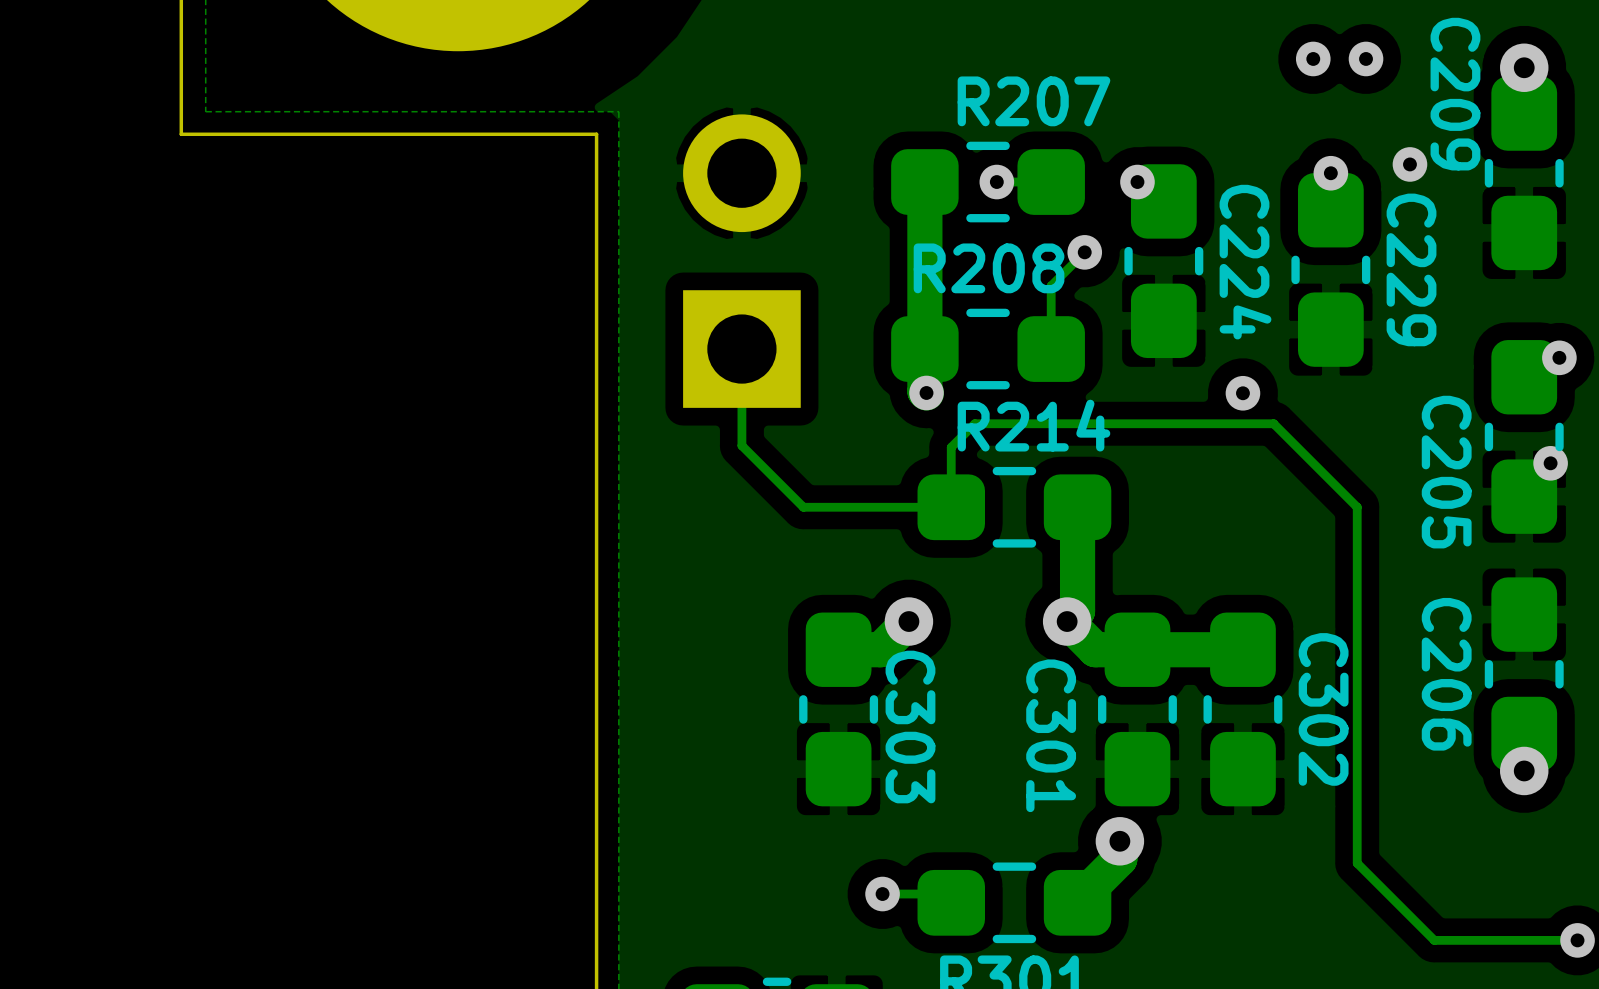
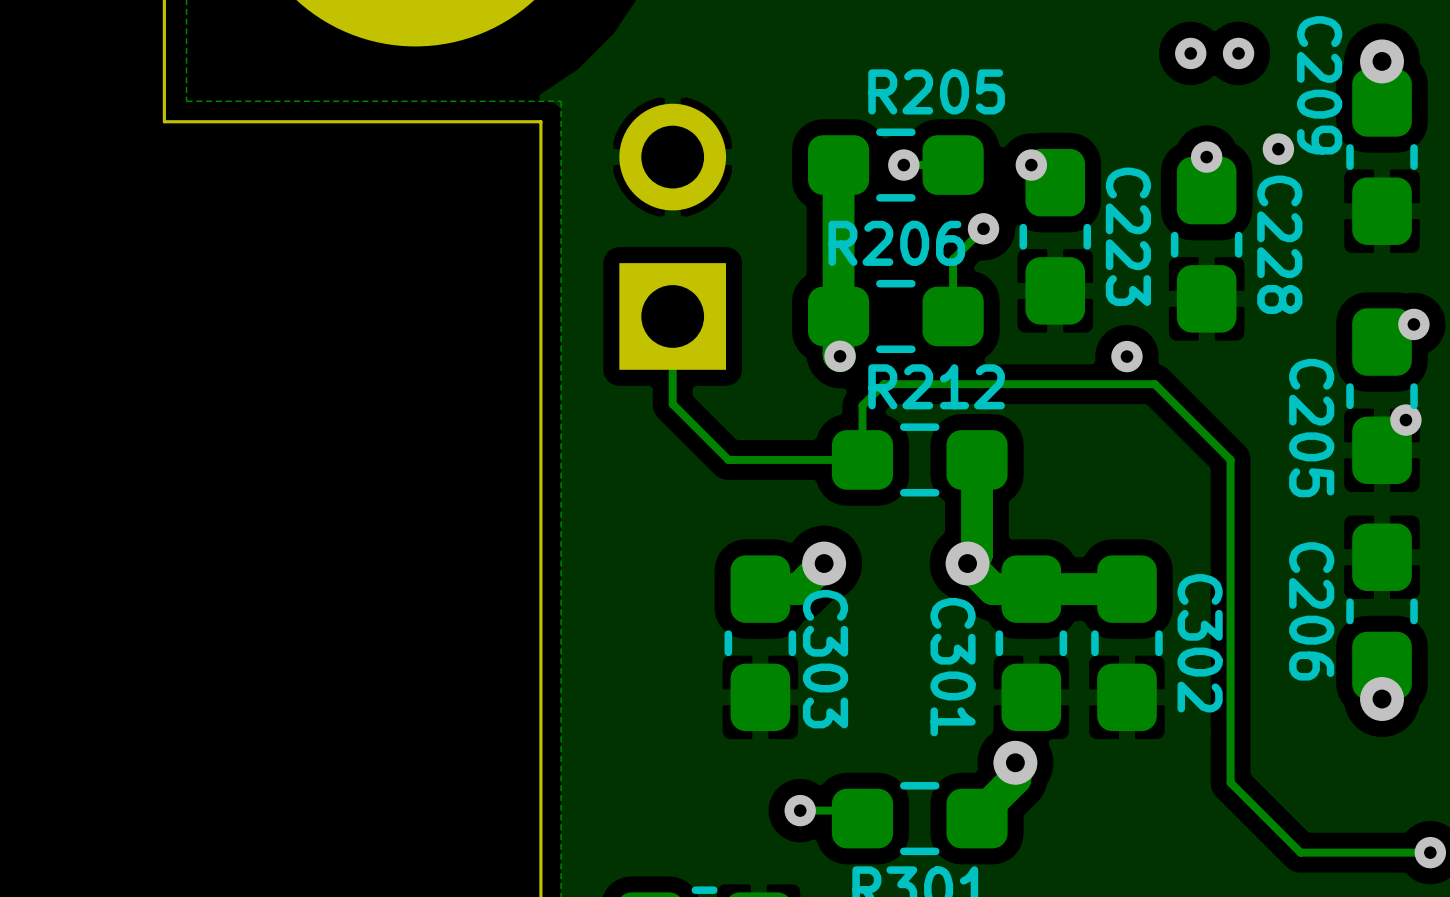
R207 name: R207 (1033, 101) -> R205 (936, 91)
C224 name: C224 (1245, 262) -> C223 (1128, 236)
R208 name: R208 (989, 268) -> R206 (896, 243)
C229 name: C229 (1411, 269) -> C228 (1279, 244)
R214 name: R214 (1033, 425) -> R212 (936, 386)

